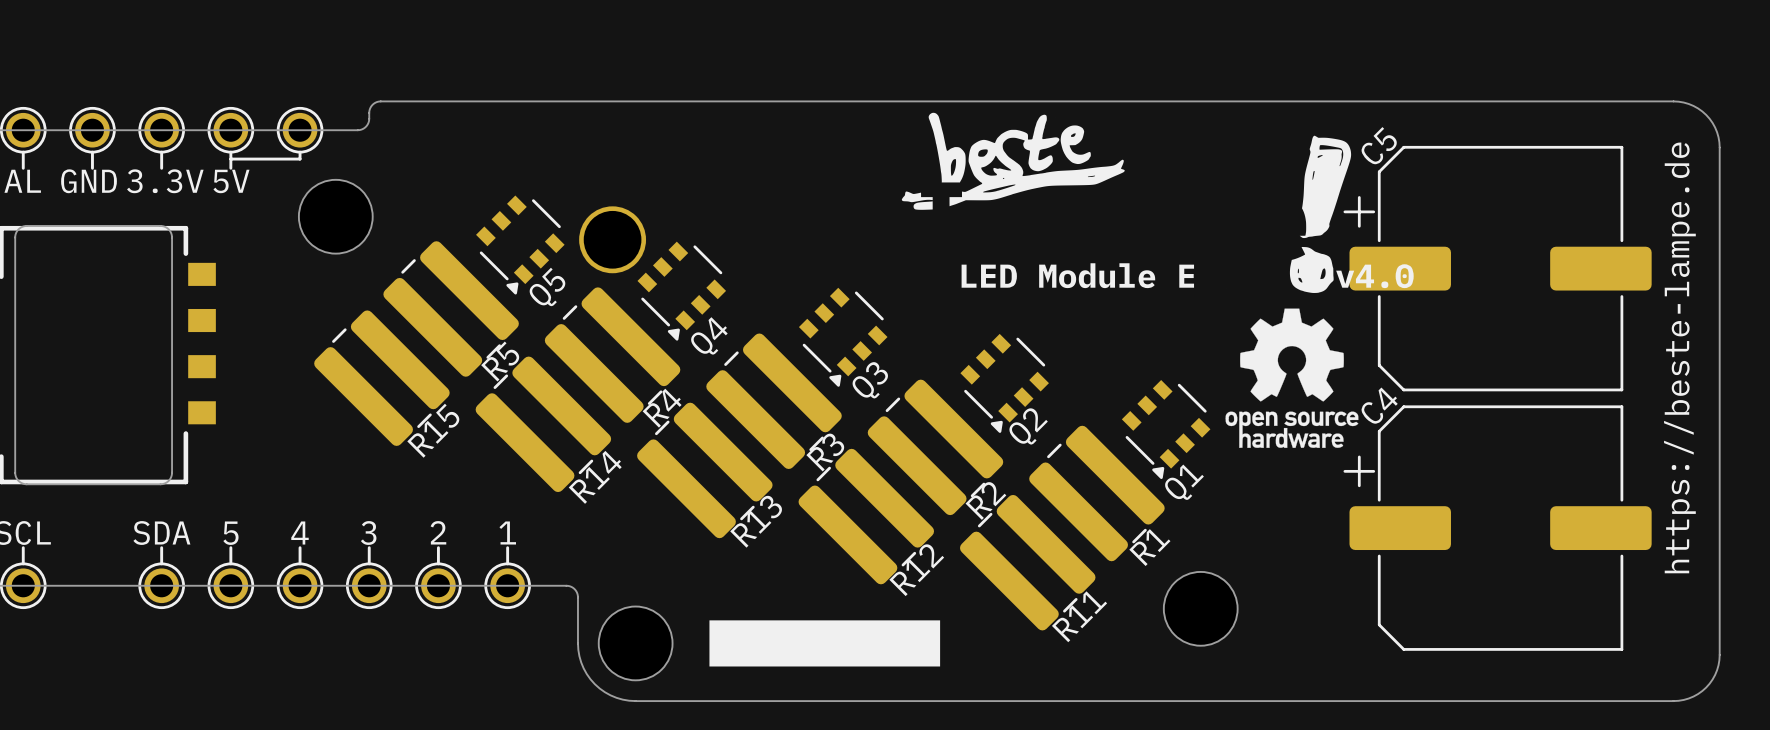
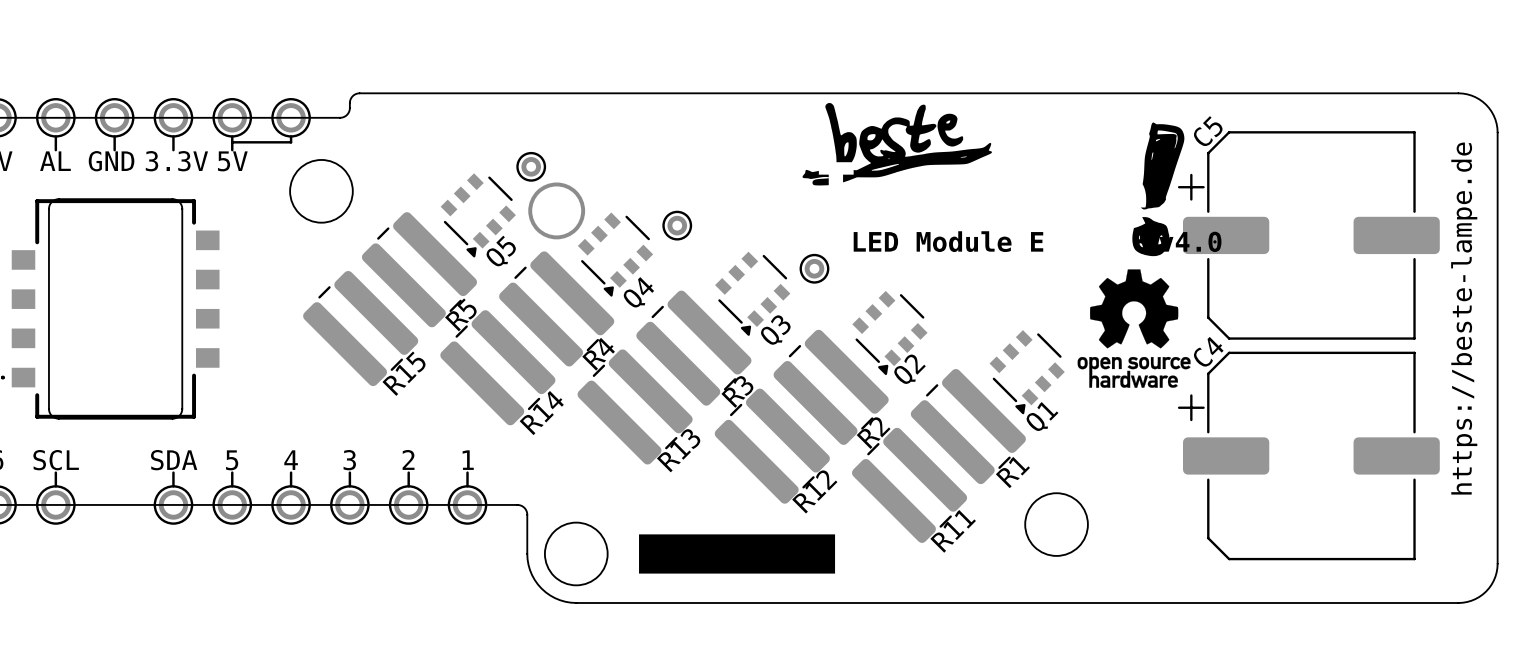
part: none -> (531, 166)
part: none -> (677, 225)
part: none -> (814, 268)

